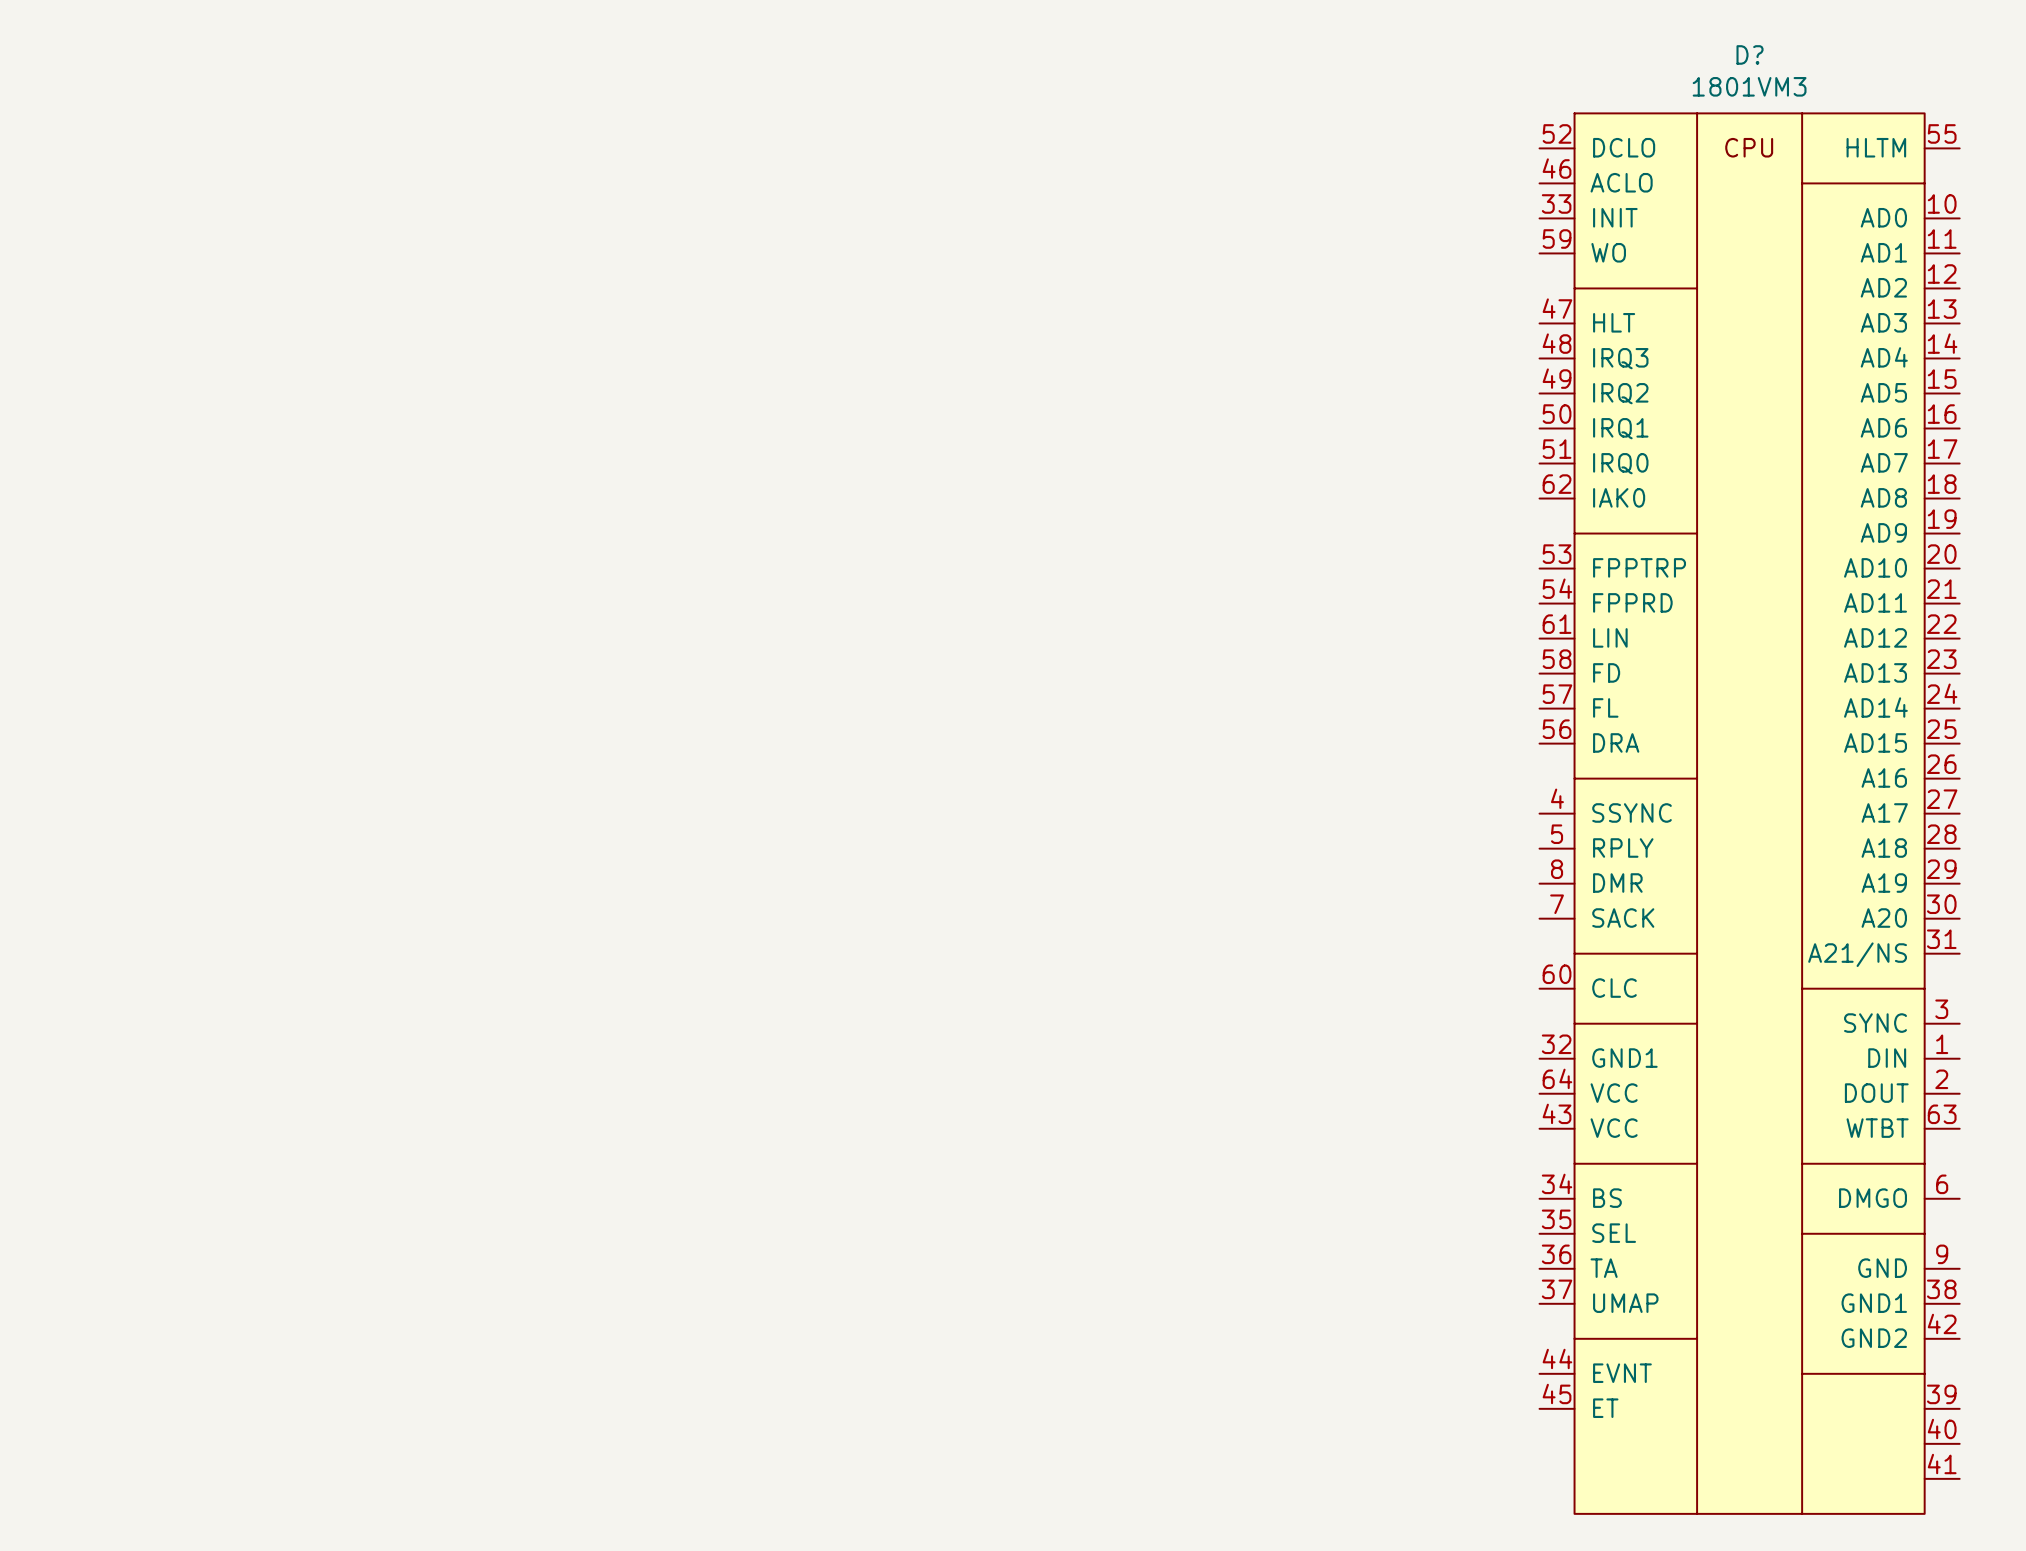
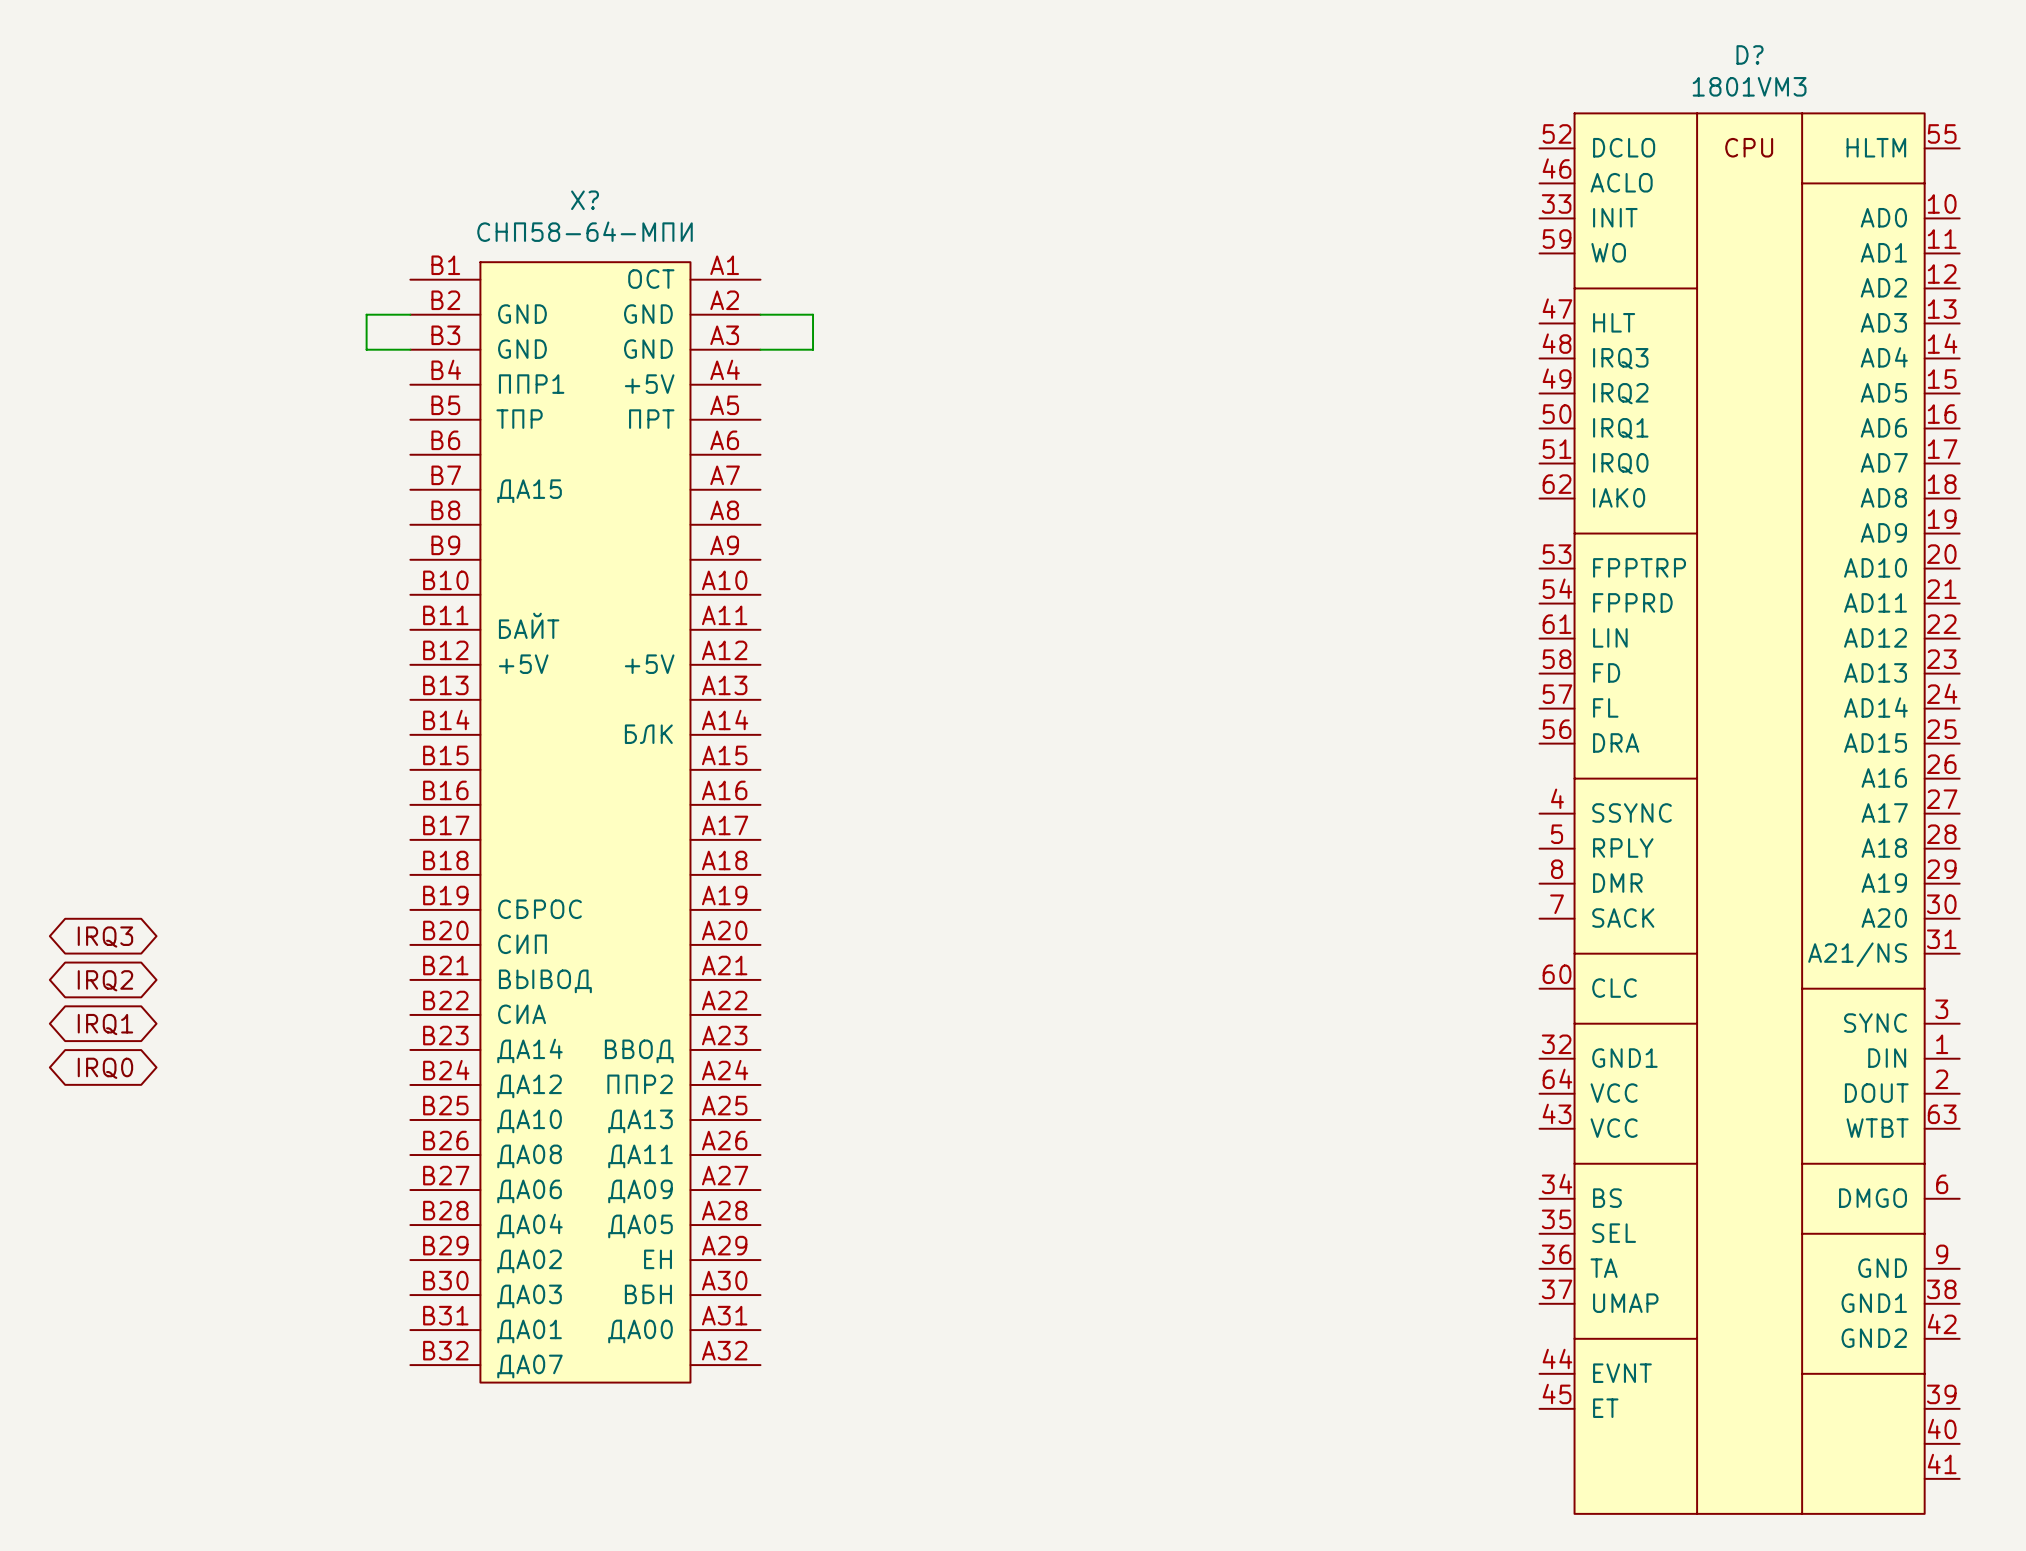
wire: none -> (410, 314) (366, 314) (366, 349) (410, 349)
wire: none -> (760, 314) (813, 314) (813, 349) (760, 349)
X?: none -> СНП58-64-МПИ (585, 822)
global label: none -> IRQ3 (105, 937)
global label: none -> IRQ2 (105, 980)
global label: none -> IRQ1 (105, 1024)
global label: none -> IRQ0 (105, 1068)

